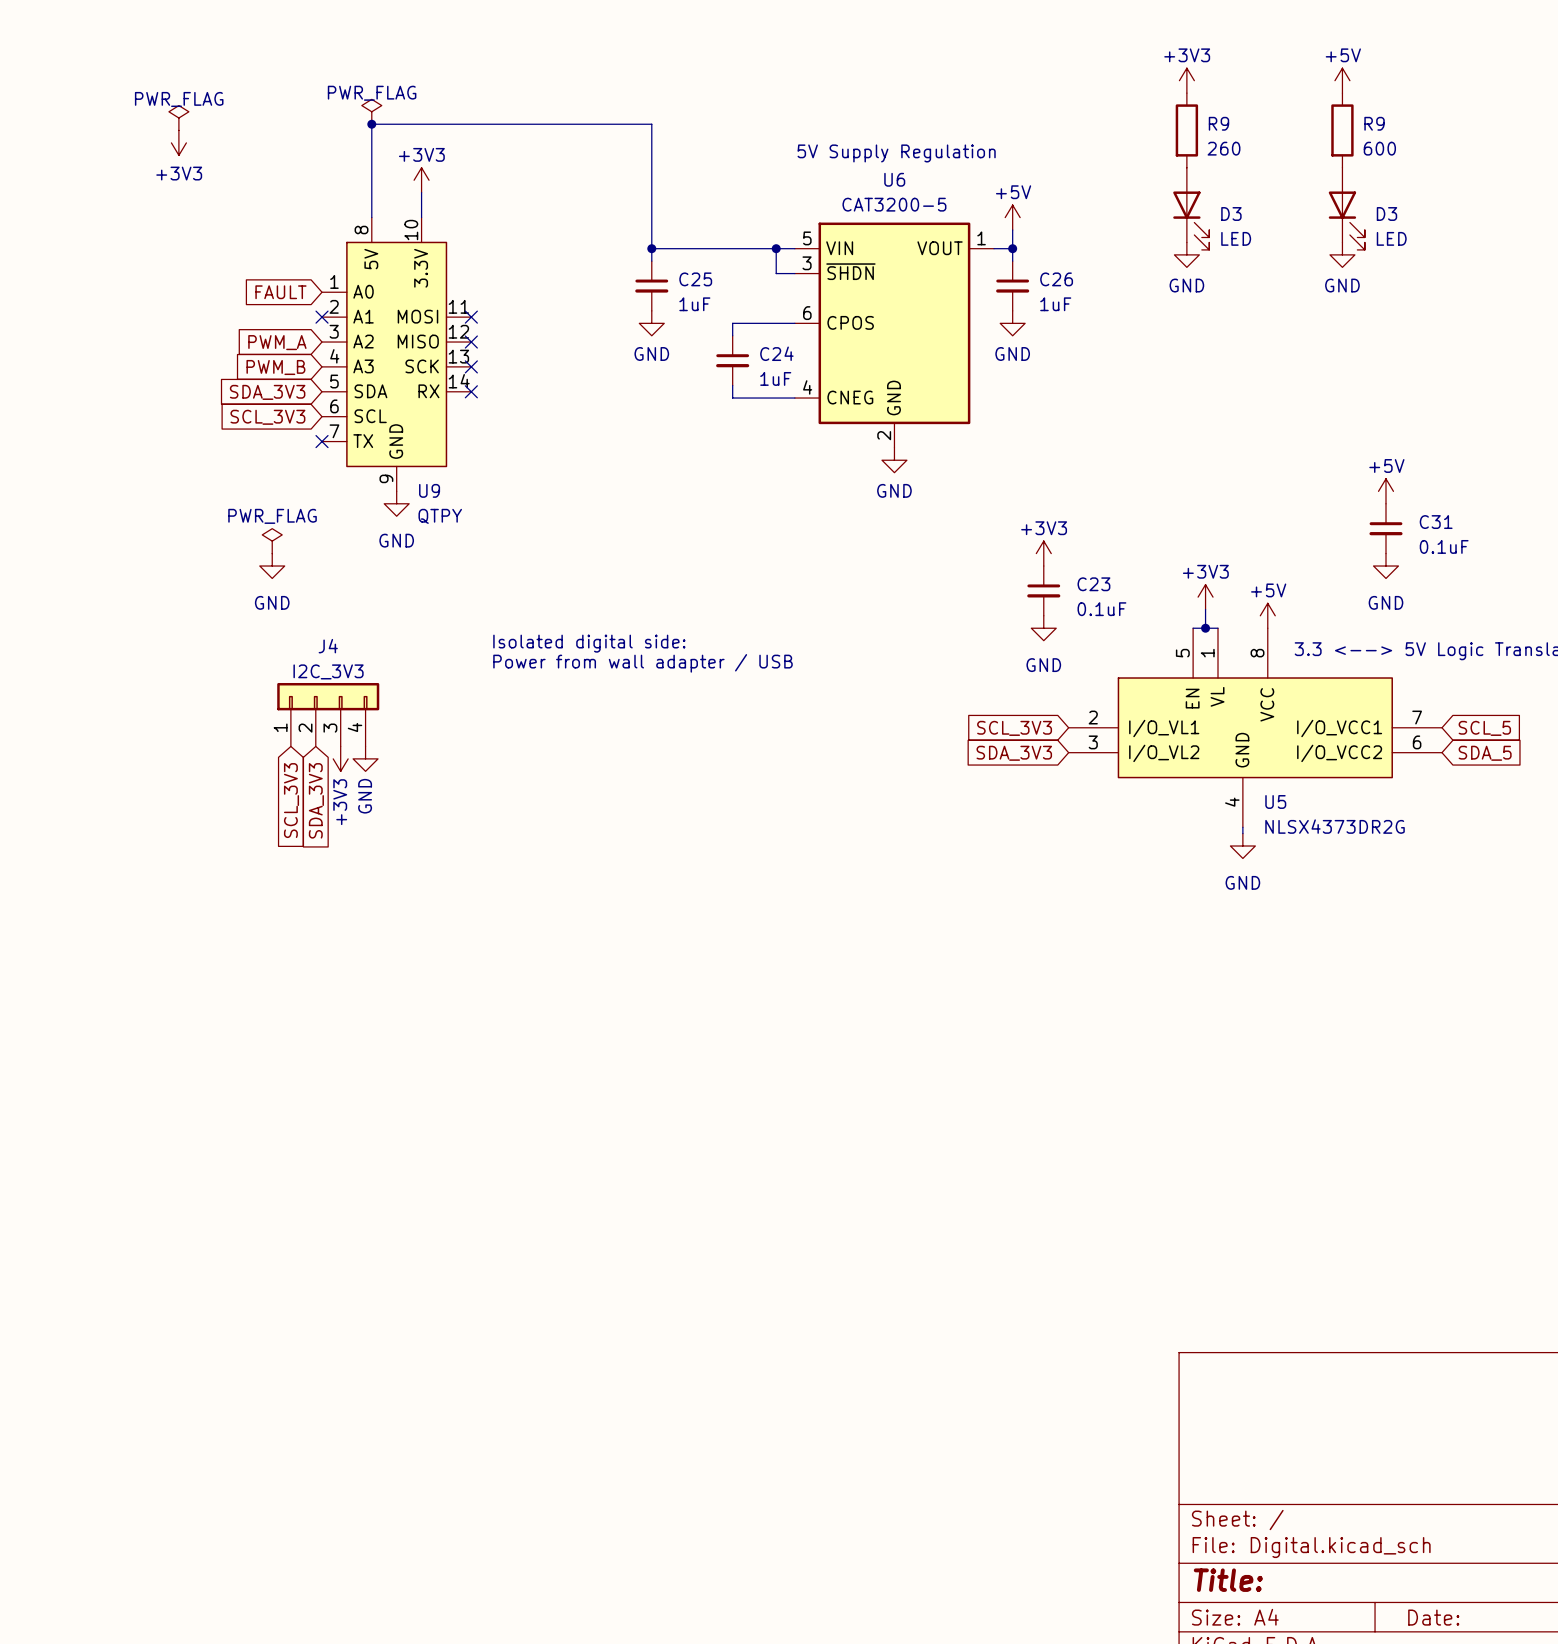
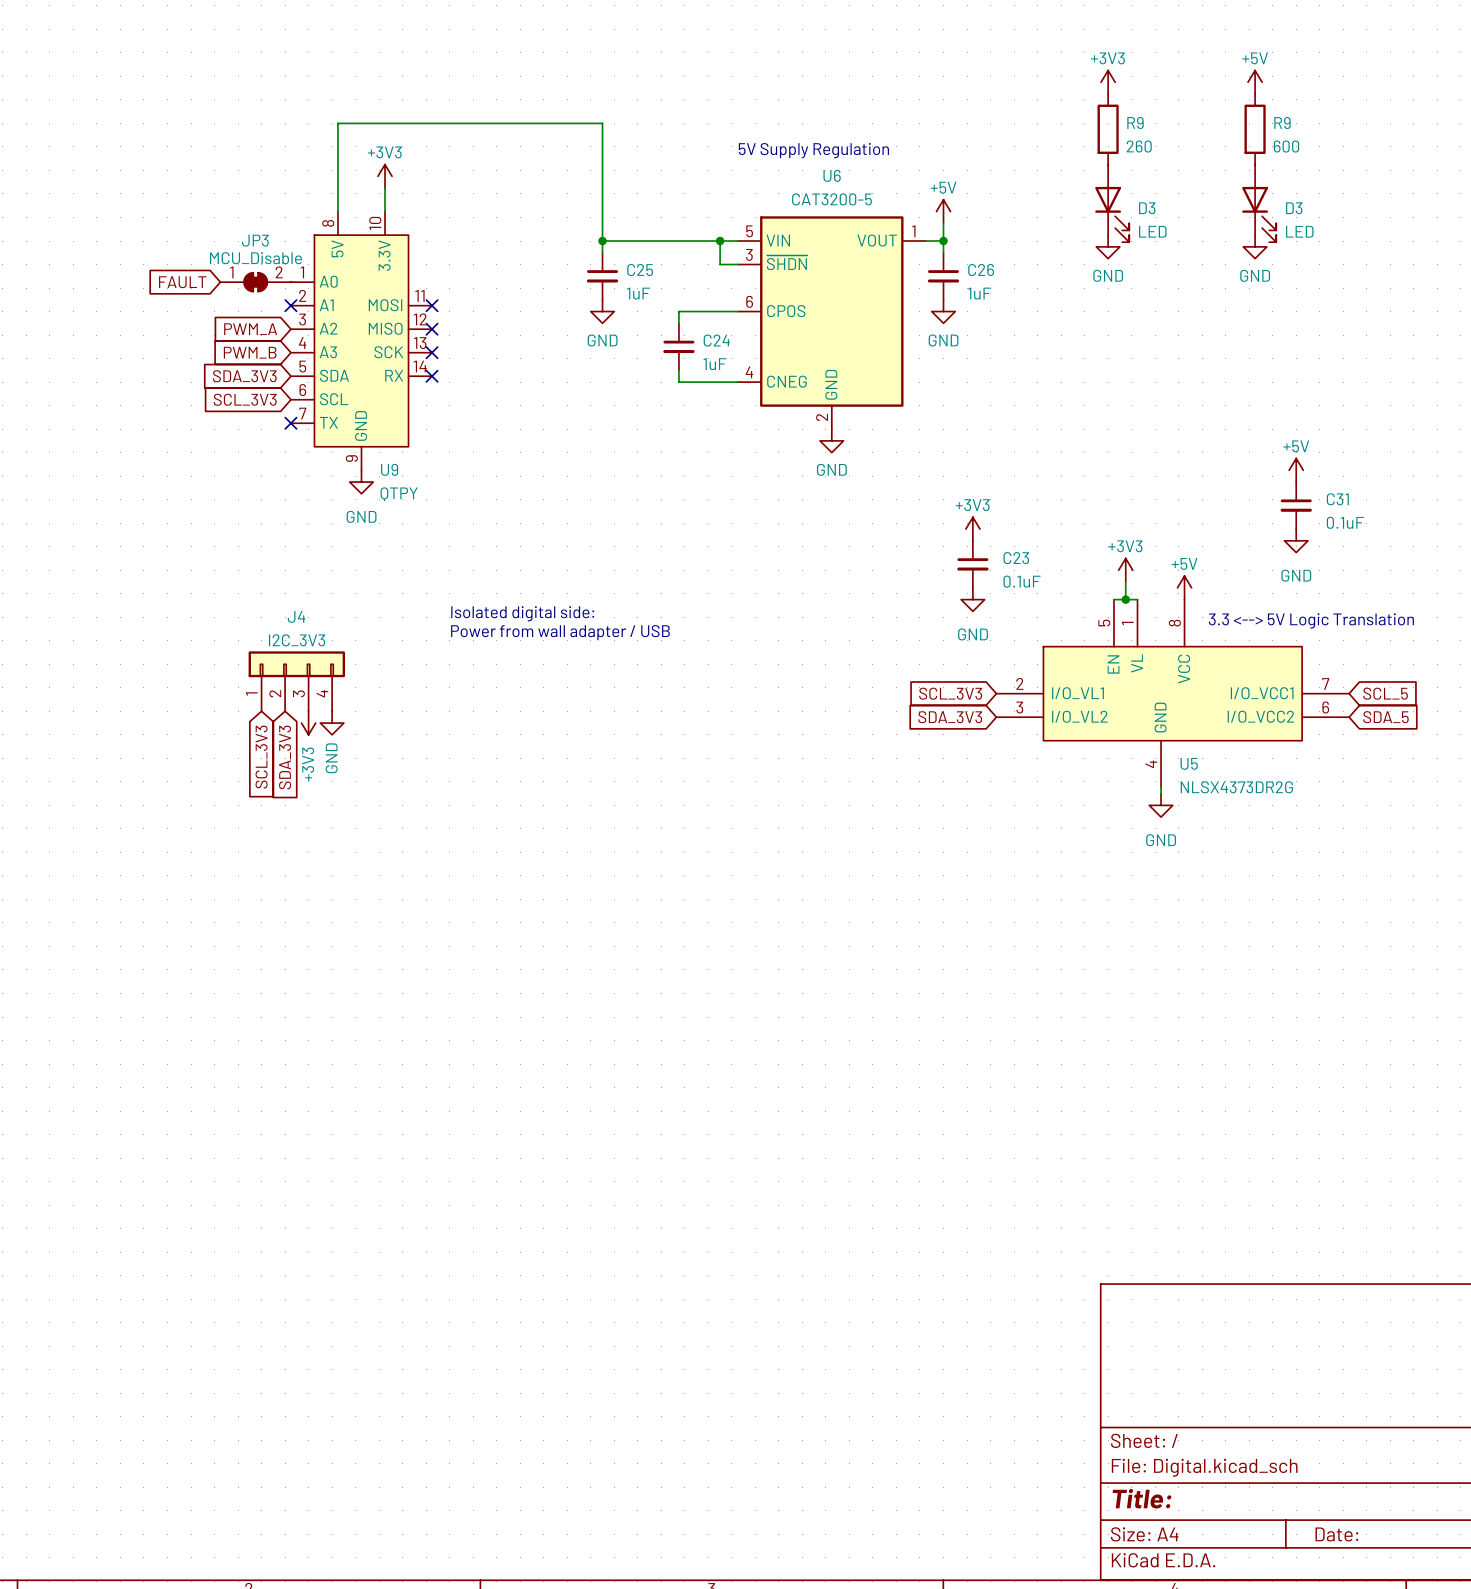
power symbol: PWR_FLAG (371, 111) -> none
power symbol: PWR_FLAG (178, 118) -> none
junction: (371, 124) -> none
power symbol: +3V3 (178, 142) -> none
global label position: FAULT (280, 292) -> FAULT (182, 282)
JP3: none -> MCU_Disable (255, 282)
power symbol: PWR_FLAG (272, 541) -> none
power symbol: GND (272, 566) -> none

